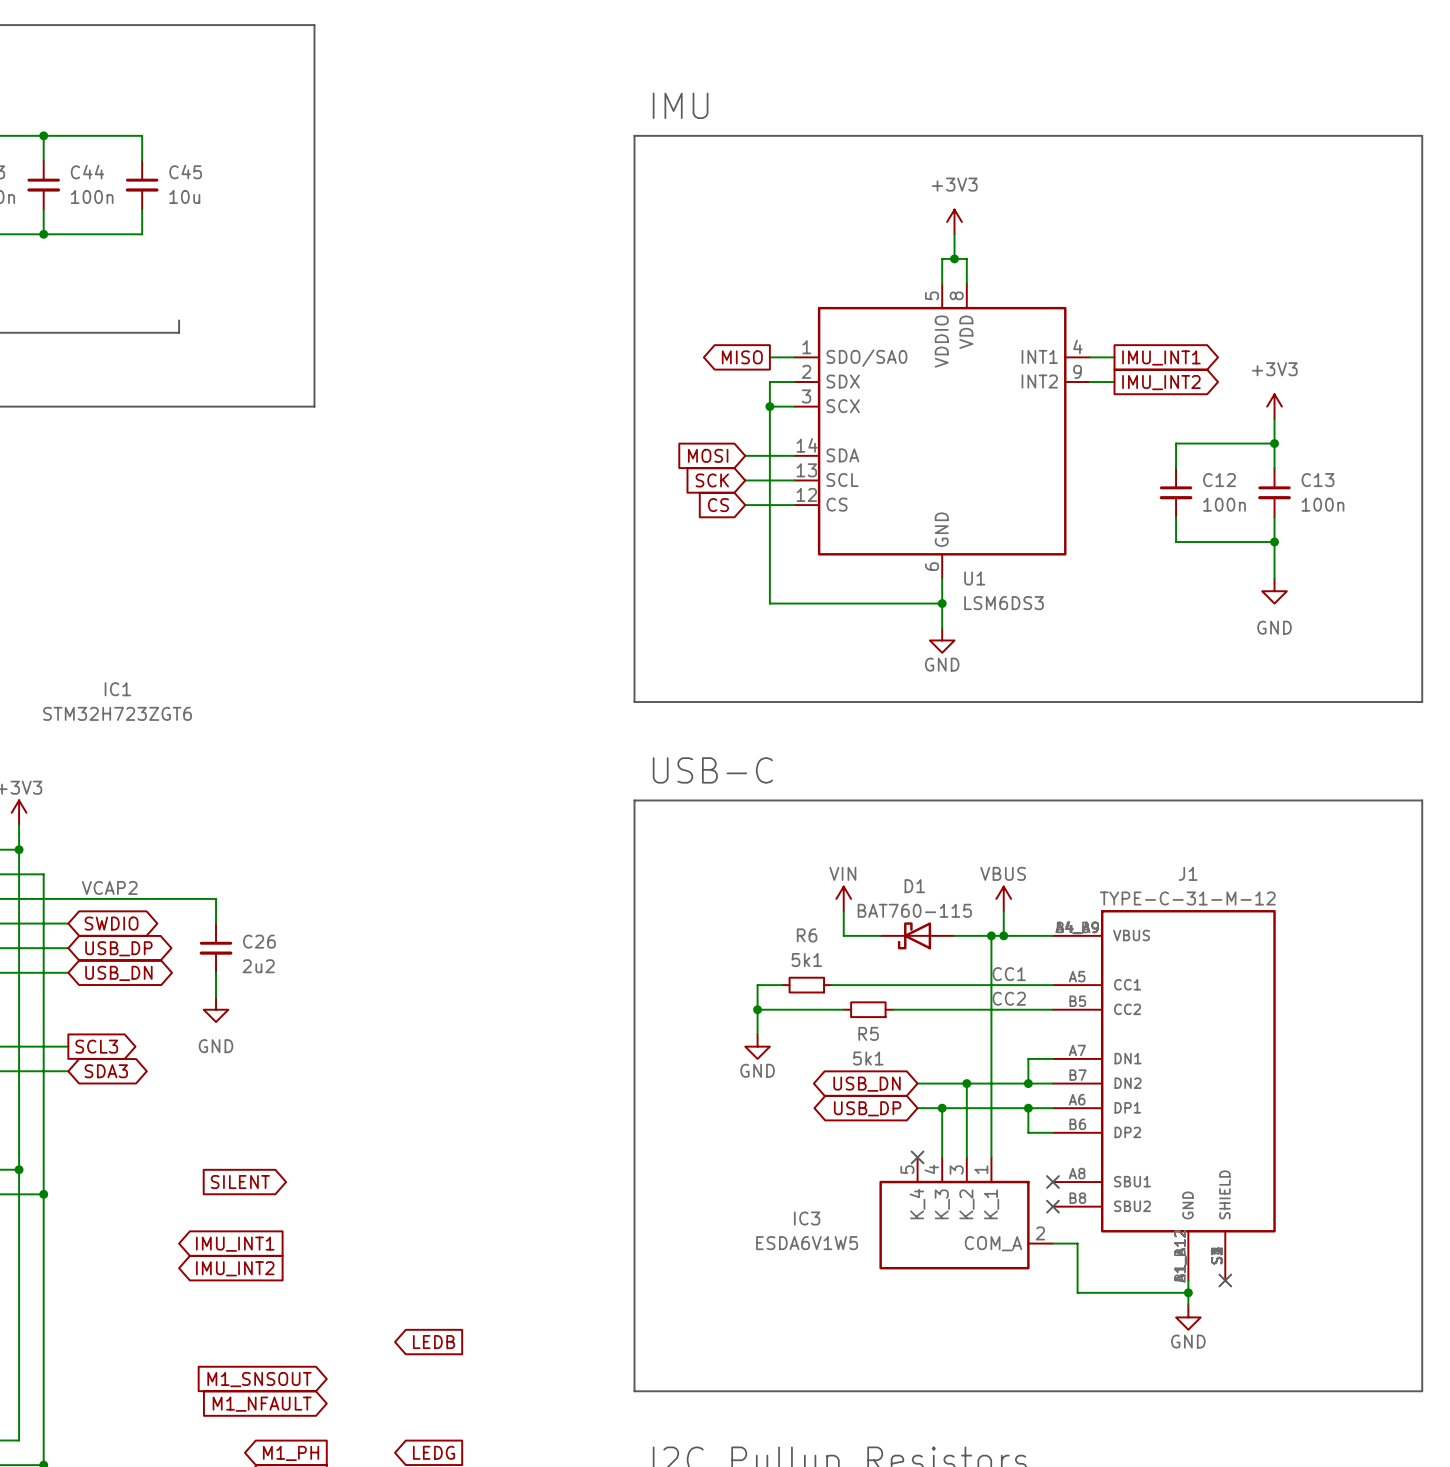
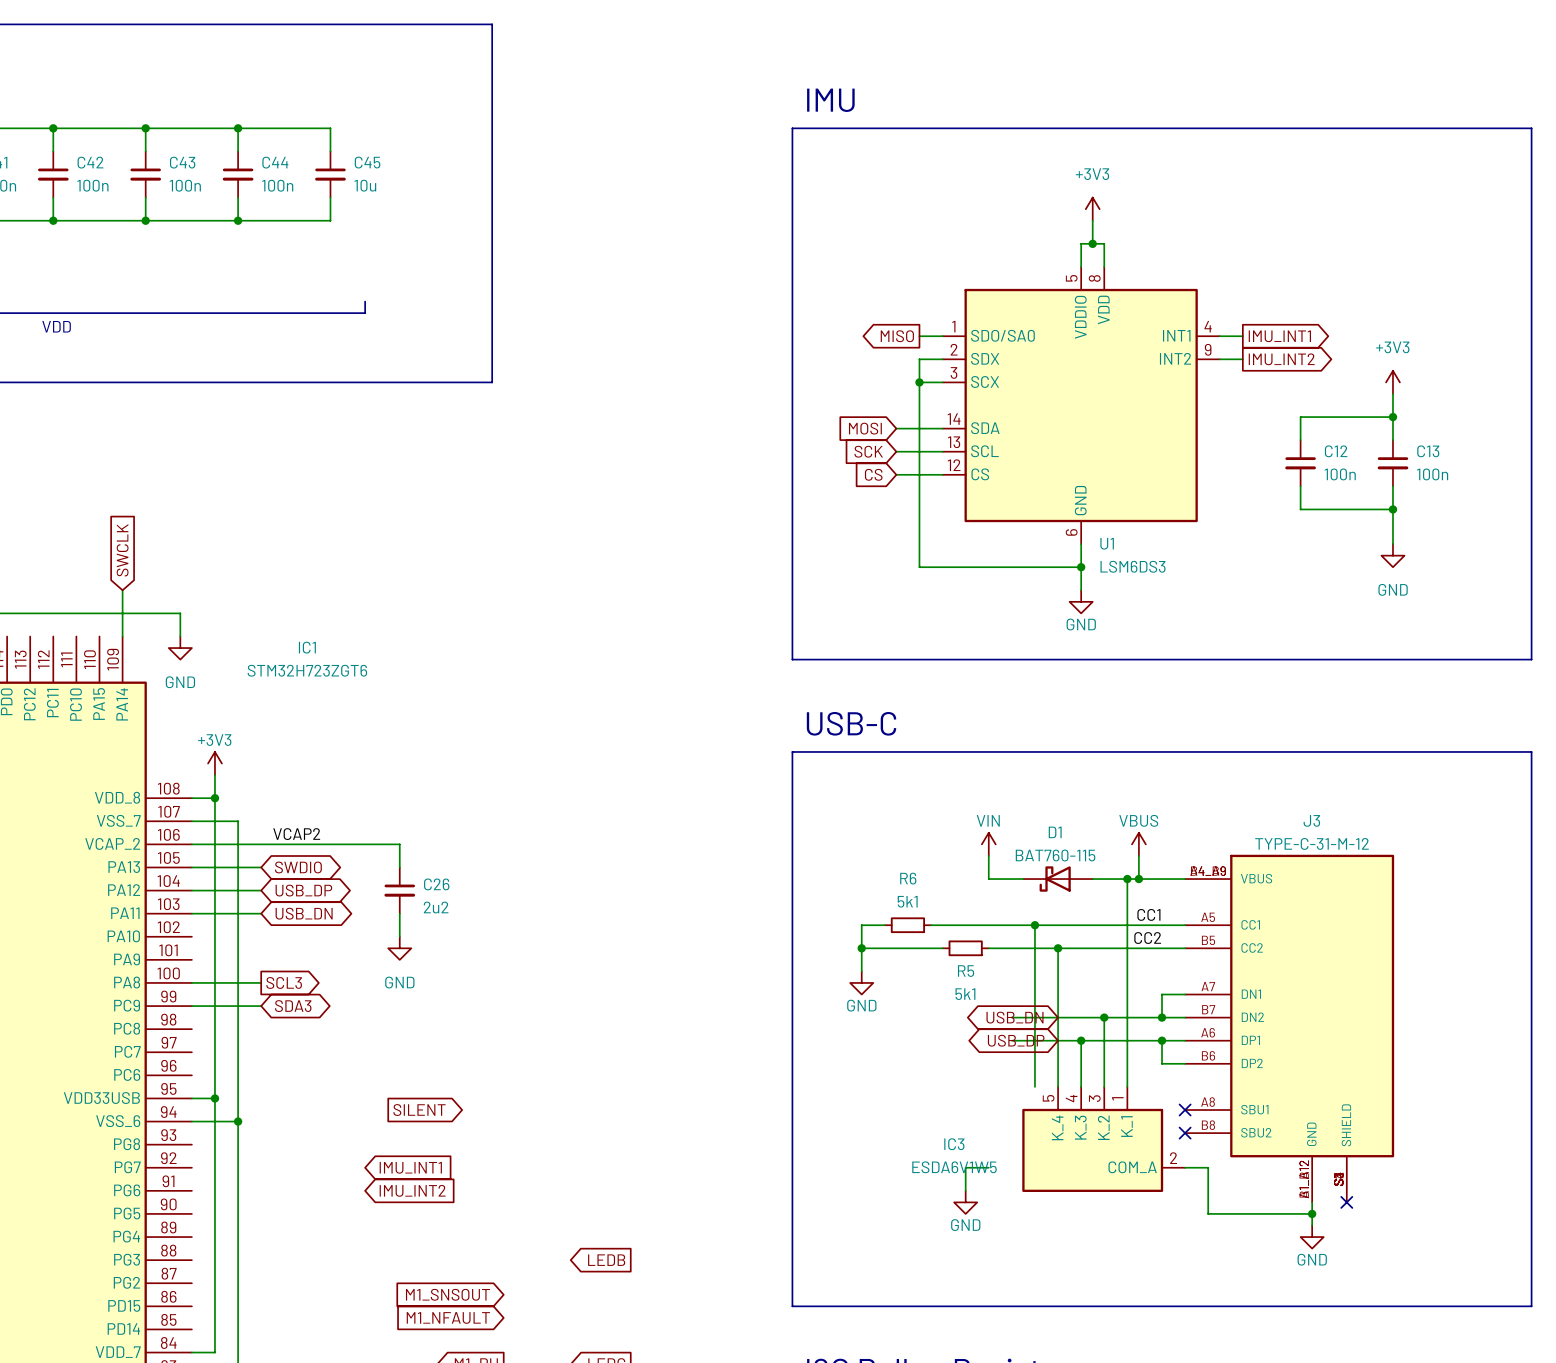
J1 name: J1 (1188, 873) -> J3 (1311, 820)
wire: none -> (884, 925) (861, 925) (861, 971)
wire: (782, 985) (757, 985) (757, 1034) -> (931, 925) (977, 925)
R6 position: (806, 985) -> (907, 925)
wire: none -> (1034, 925) (1034, 1086)
junction: none -> (1034, 925)
wire: none -> (861, 948) (907, 948)
junction position: (757, 1009) -> (861, 948)
wire: (794, 1009) (843, 1009) -> (1034, 948) (988, 948)
R5 position: (868, 1009) -> (965, 948)
wire: none -> (1058, 948) (1058, 1086)
junction: none -> (1058, 948)
power symbol position: GND (757, 1046) -> GND (861, 982)
wire: none -> (1011, 1017) (1058, 1017)
wire: none -> (1011, 1040) (1058, 1040)
no-connect mark: (917, 1157) -> none
wire: none -> (988, 1167) (965, 1167) (965, 1190)
power symbol: none -> GND (965, 1202)

